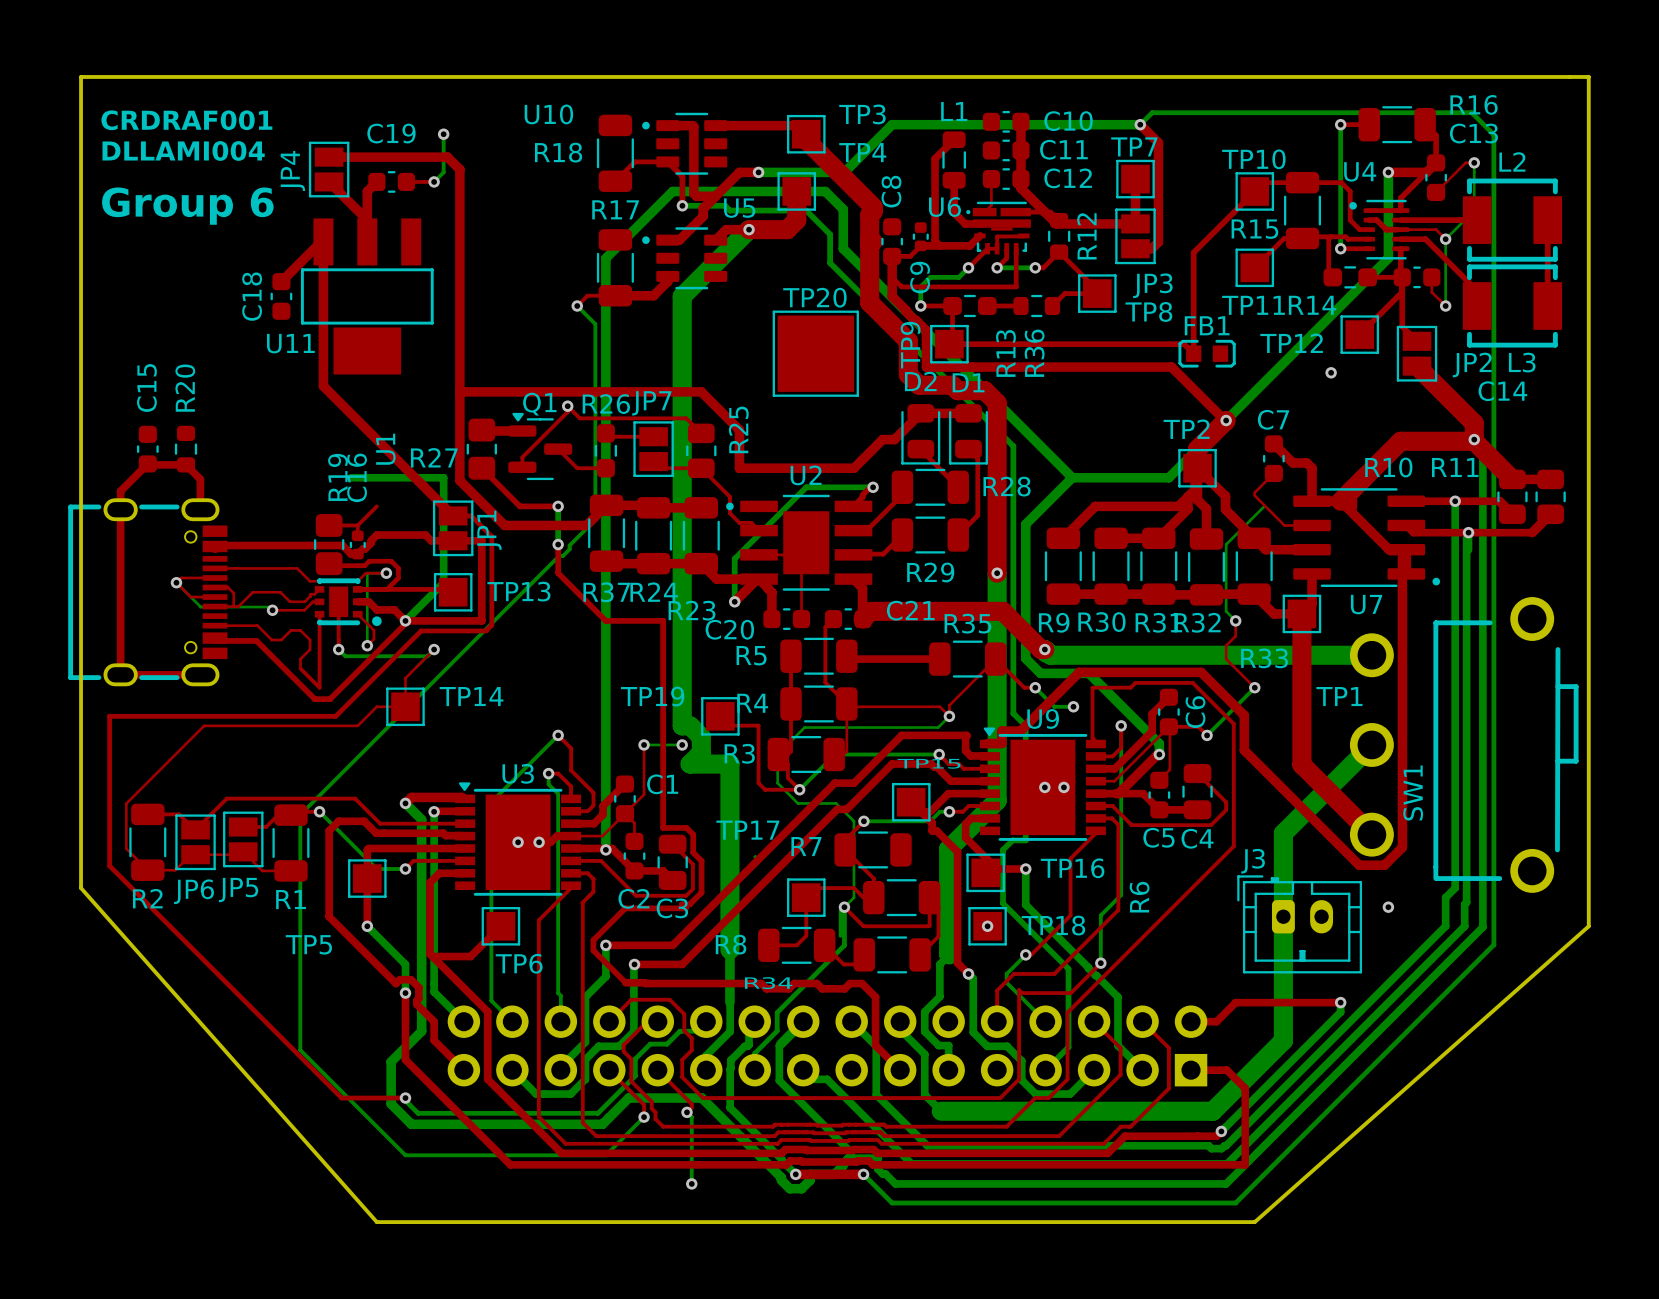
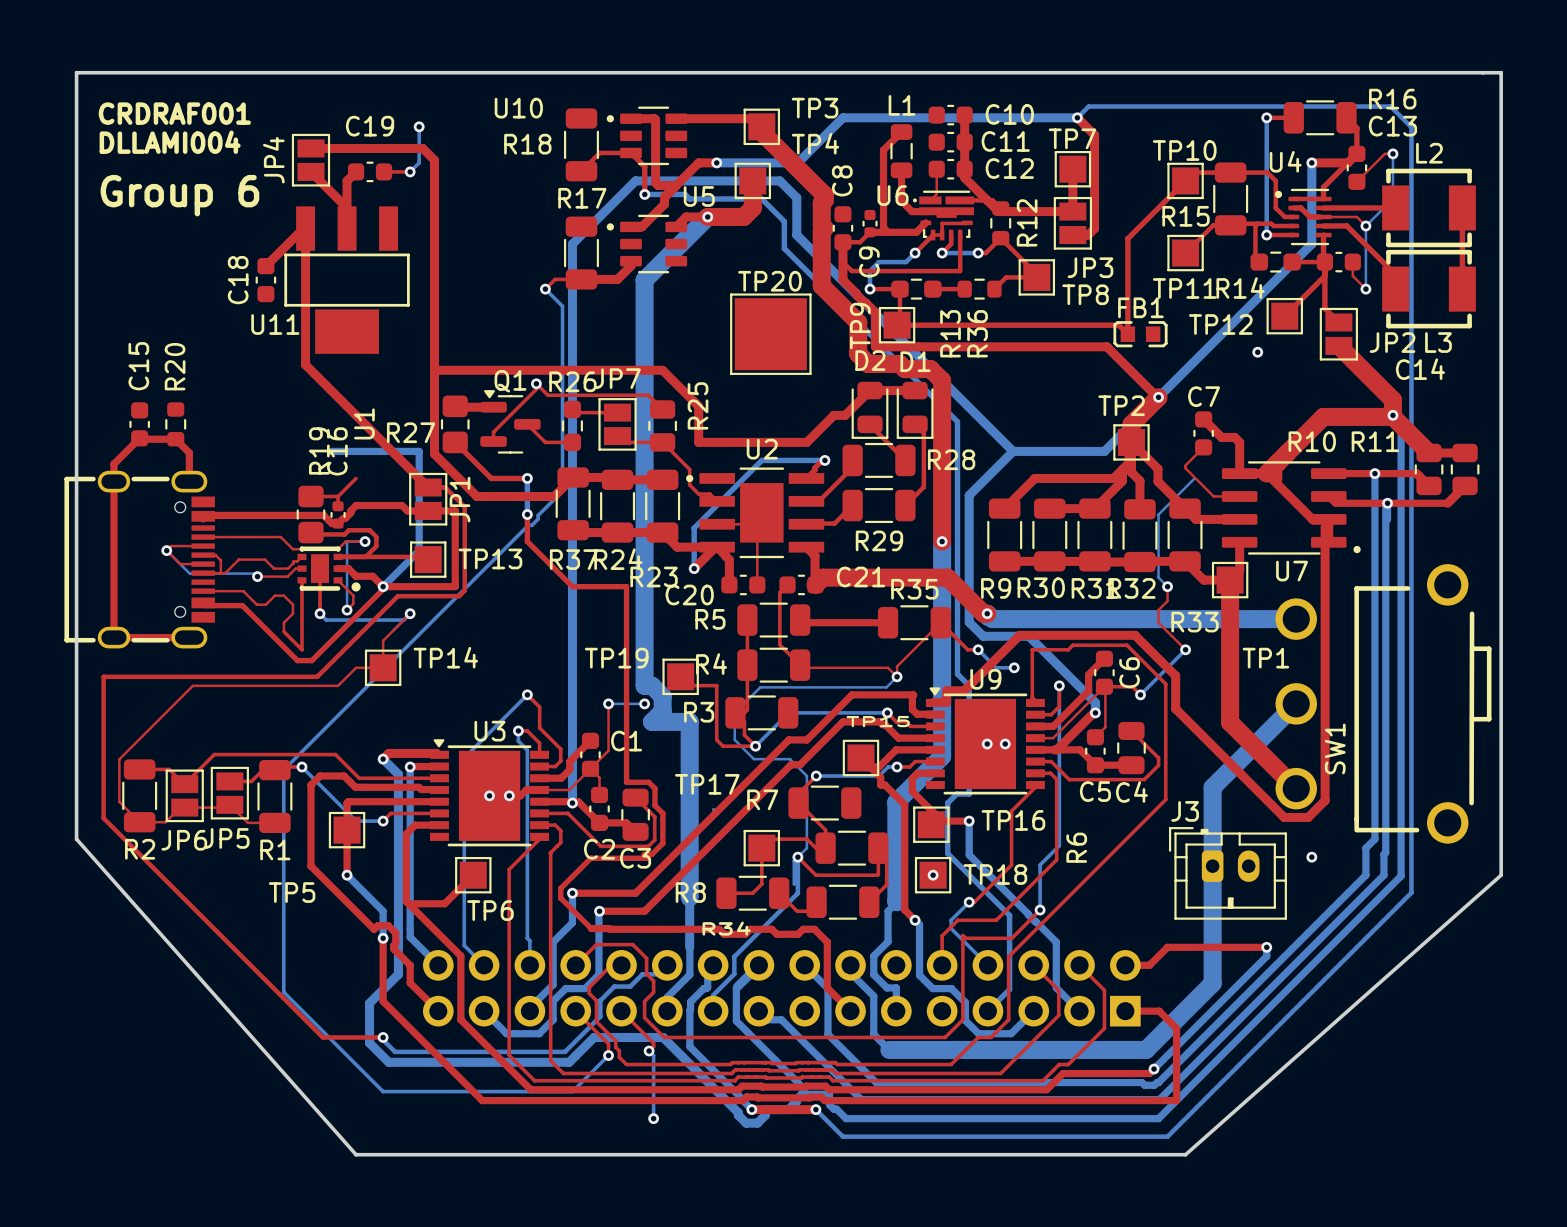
top track: (846, 703) (846, 751) (843, 754) -> none

